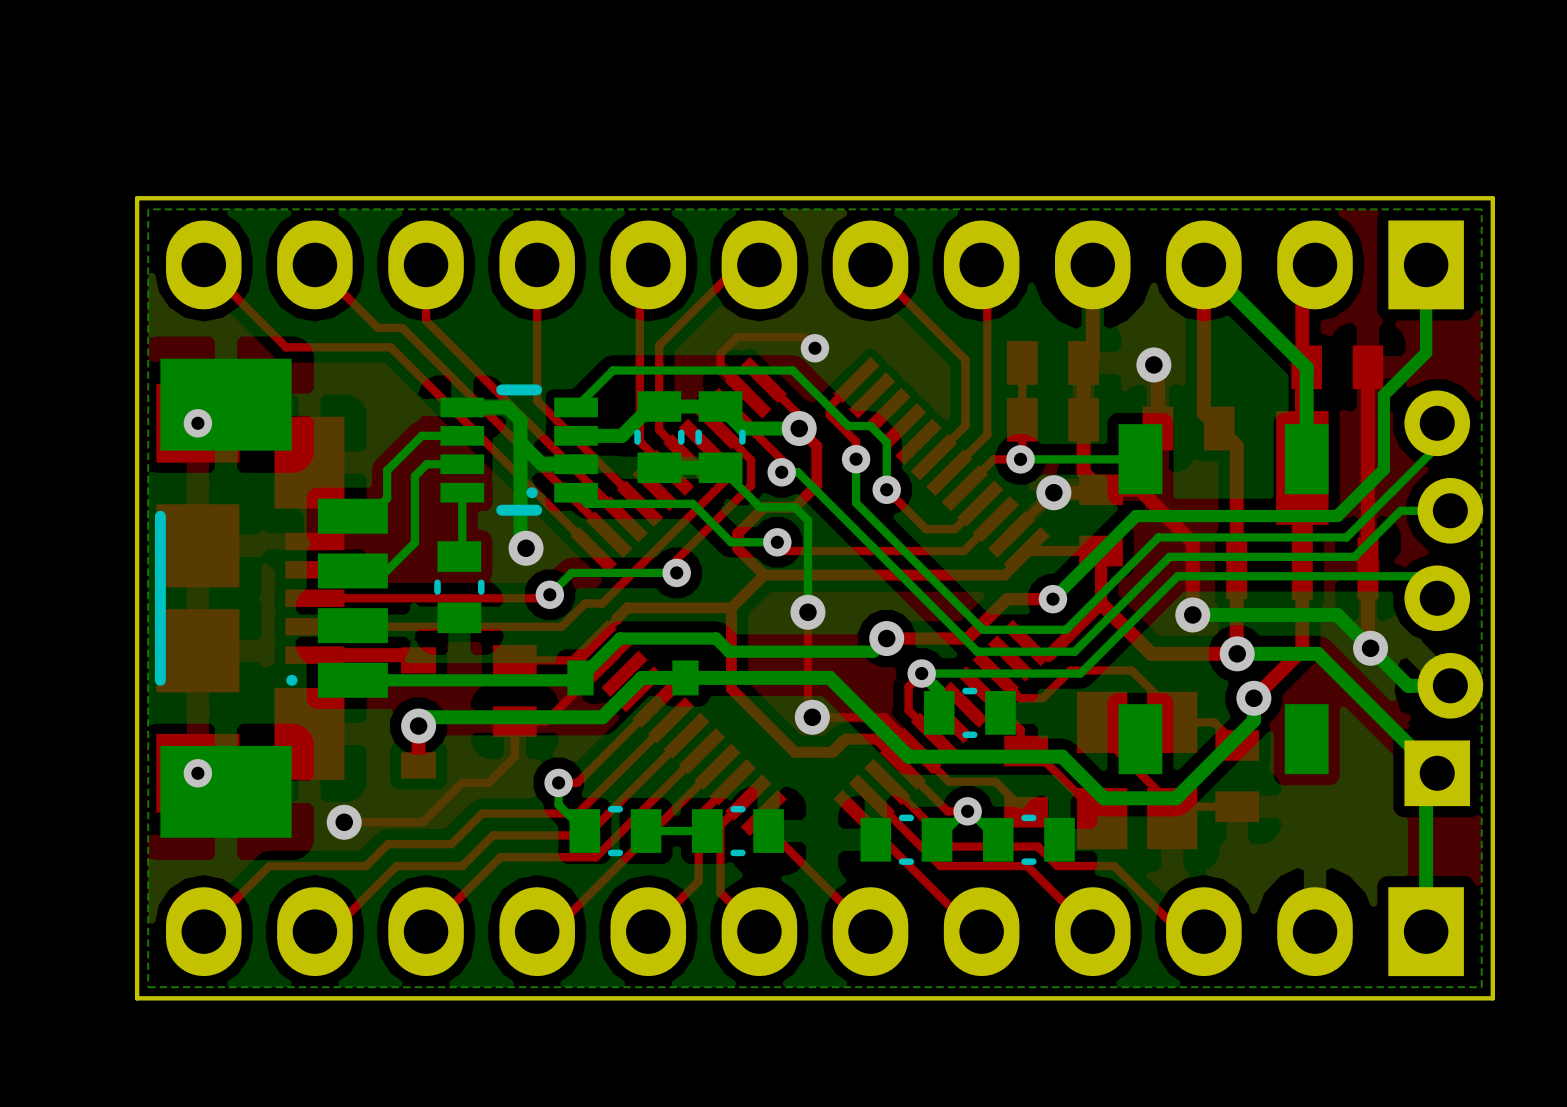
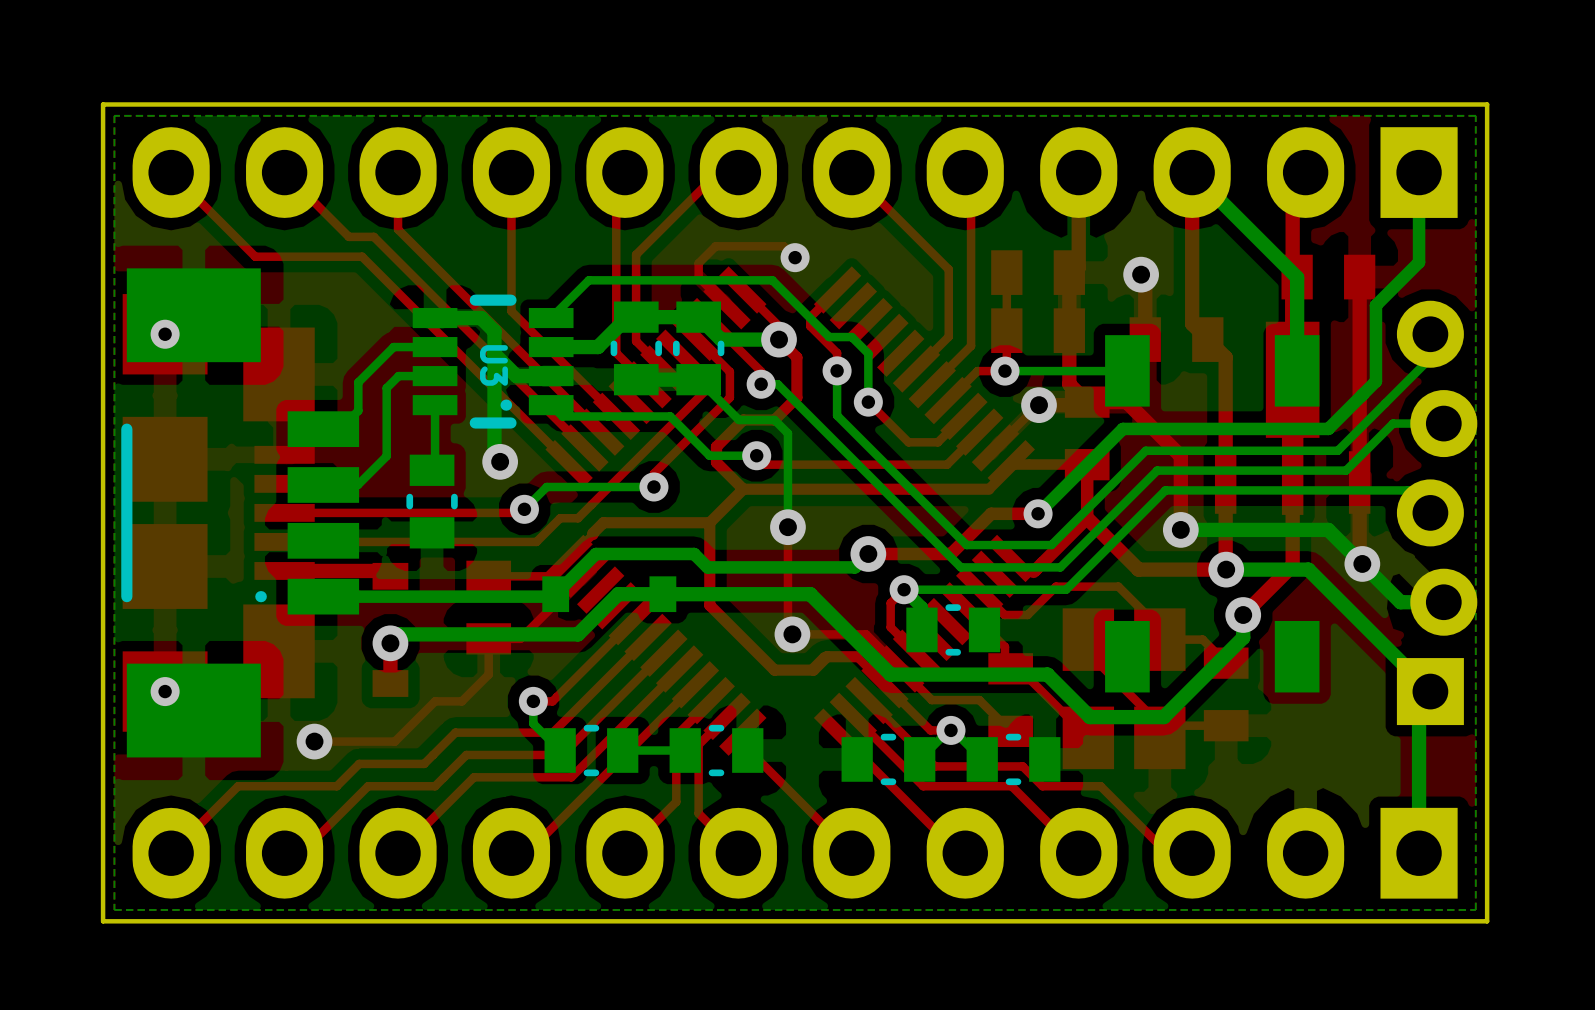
U3 name: none -> U3 (493, 365)

